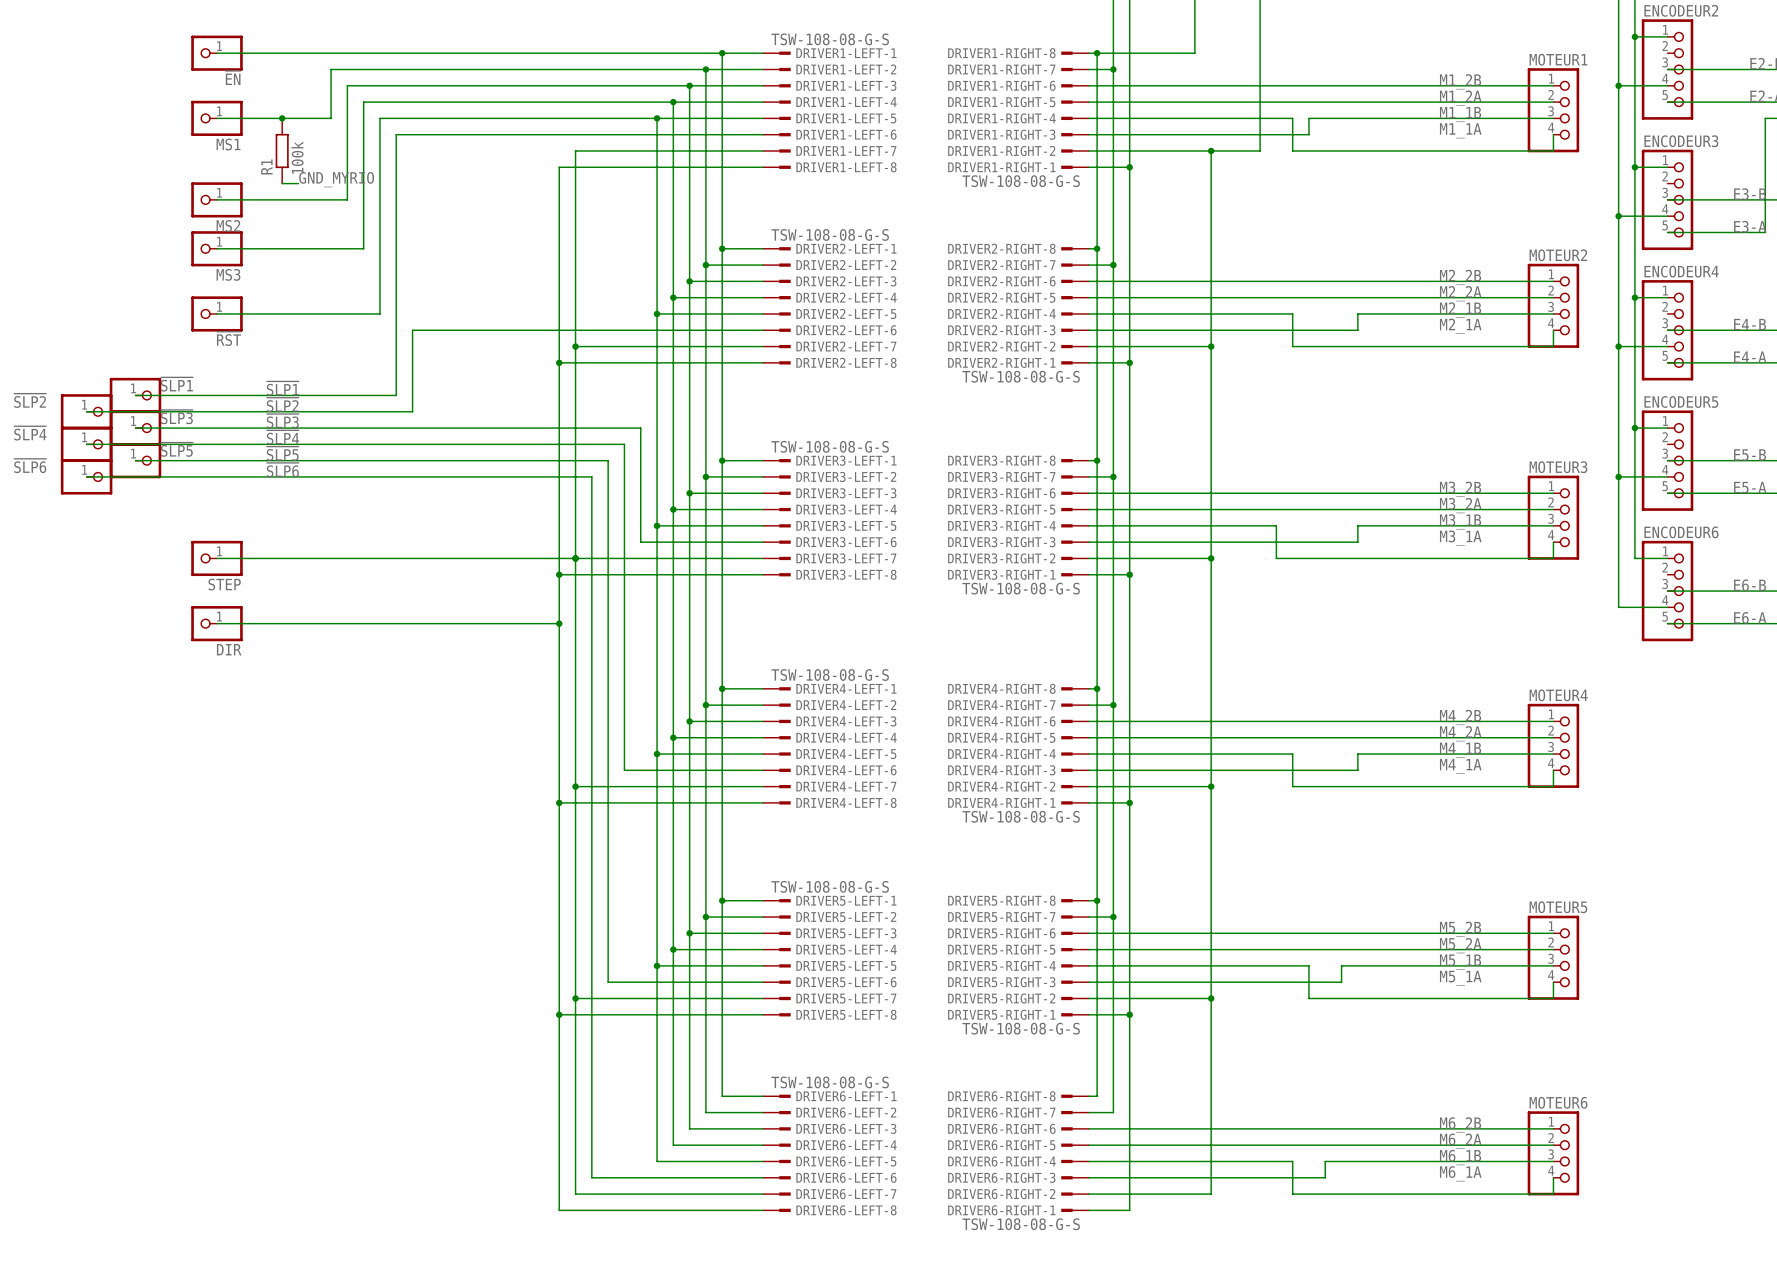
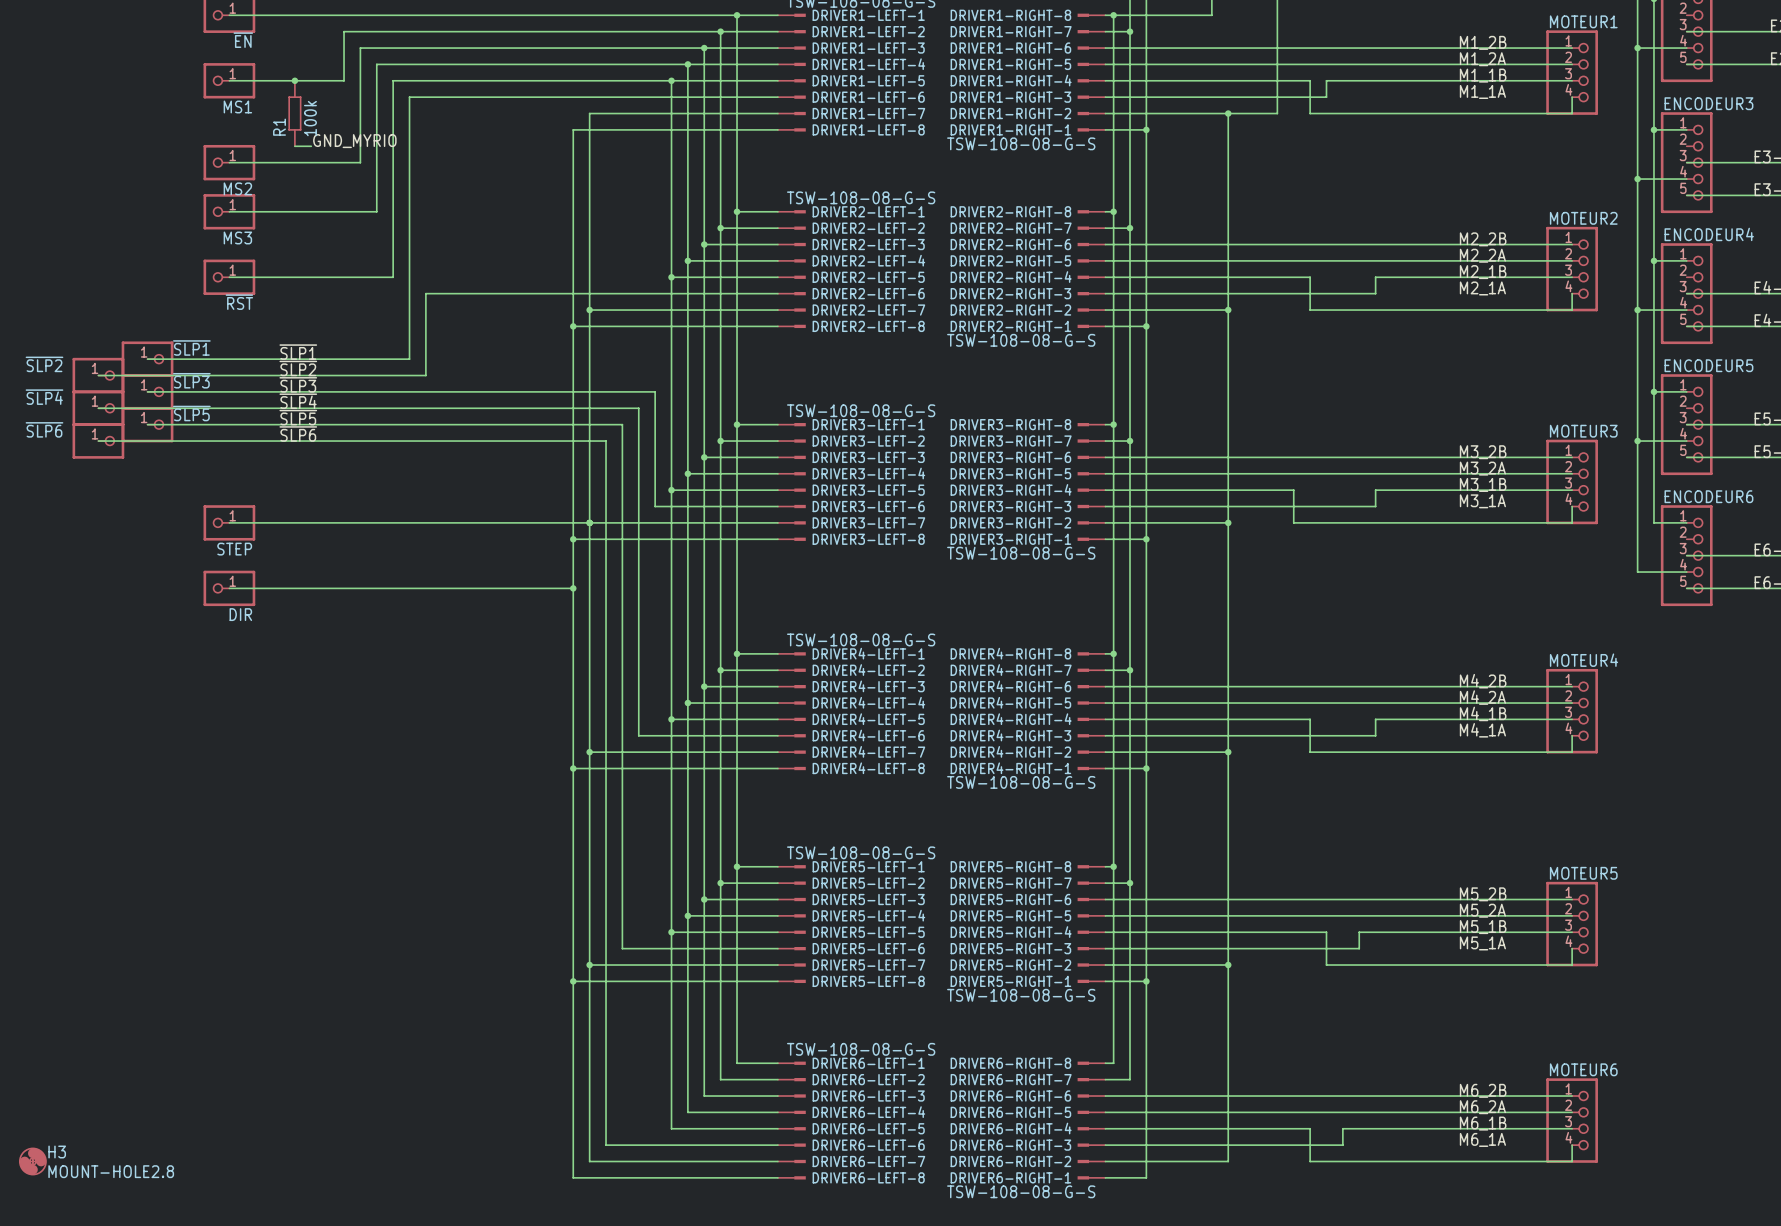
H3: none -> MOUNT-HOLE2.8 (32, 1161)

